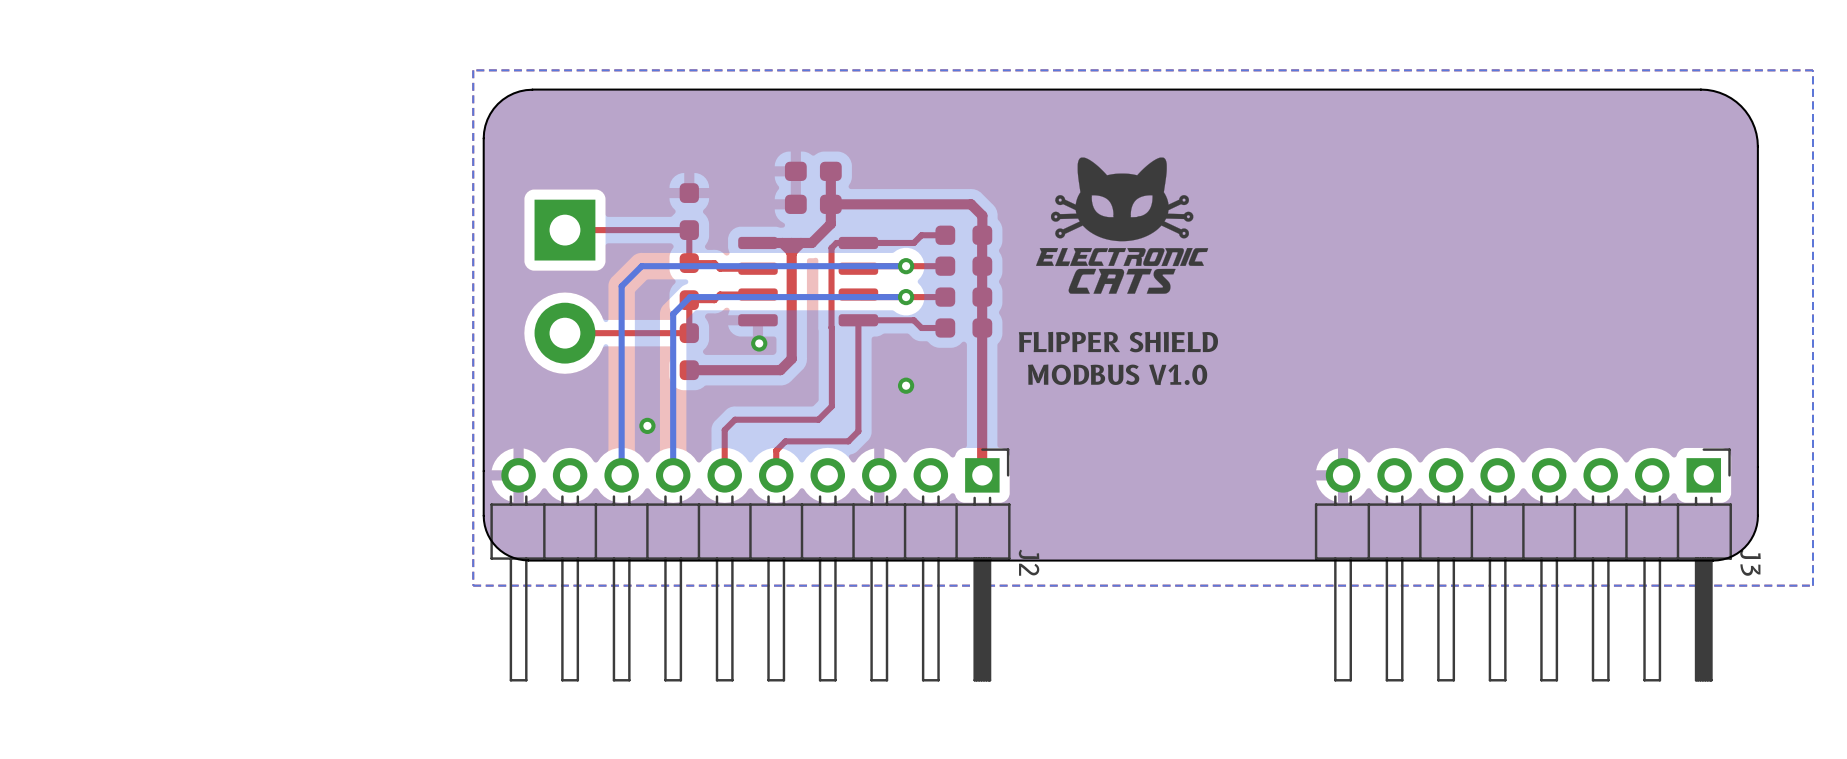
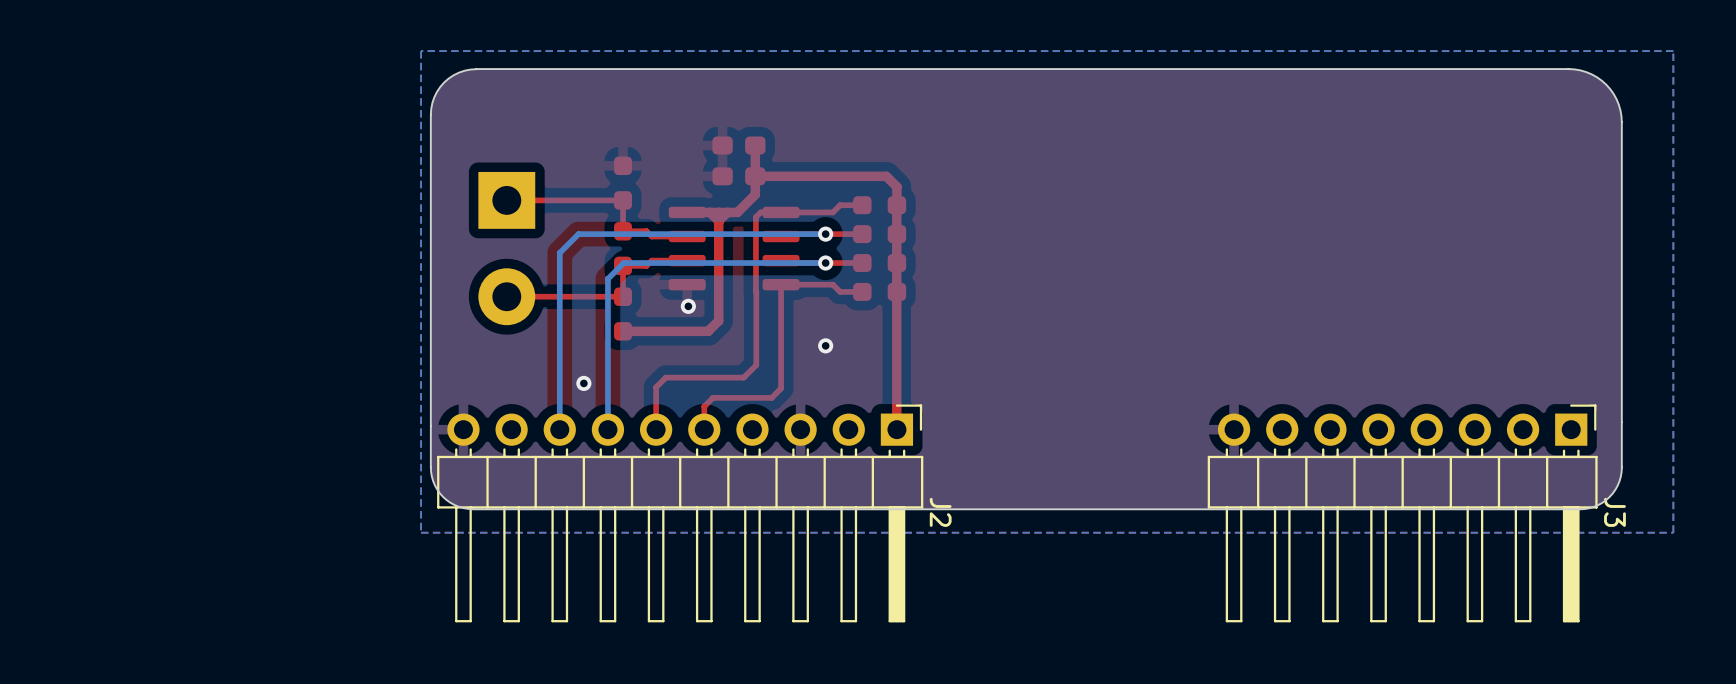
drawing: [1036, 157, 1209, 294] -> none
text: FLIPPER SHIELD (1118, 342) -> none
text: MODBUS V1.0 (1117, 374) -> none

